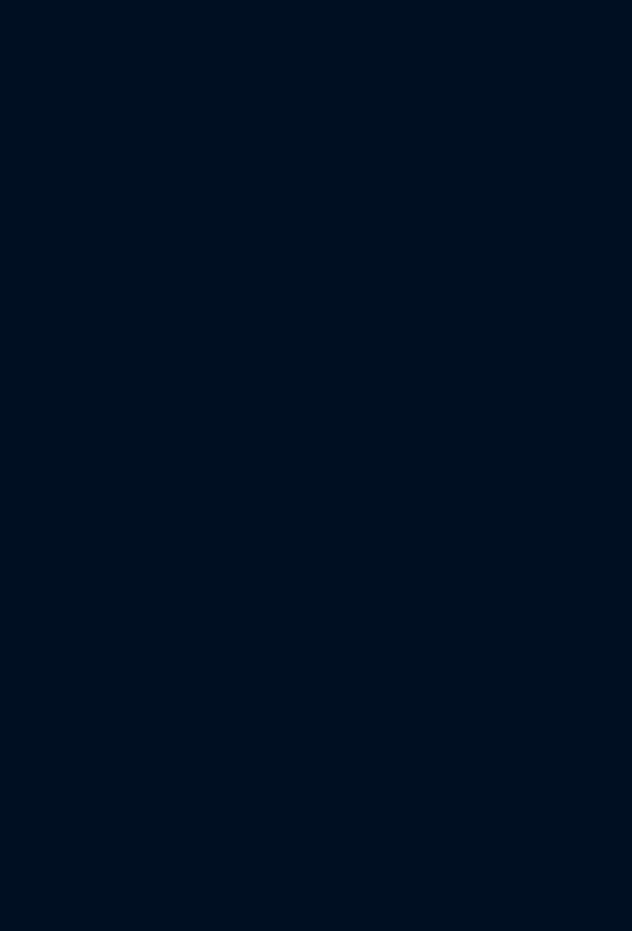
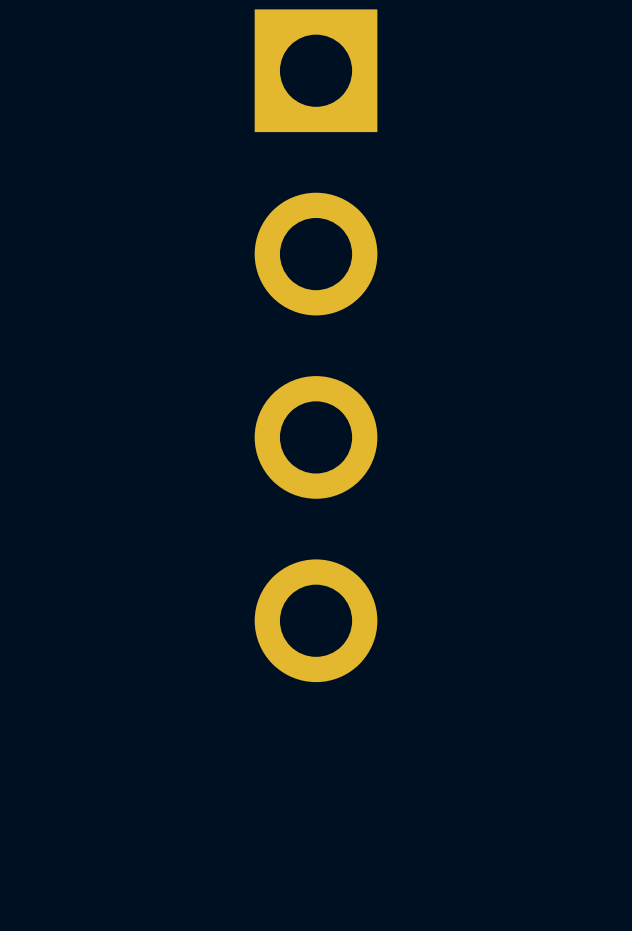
part: none -> (316, 345)

